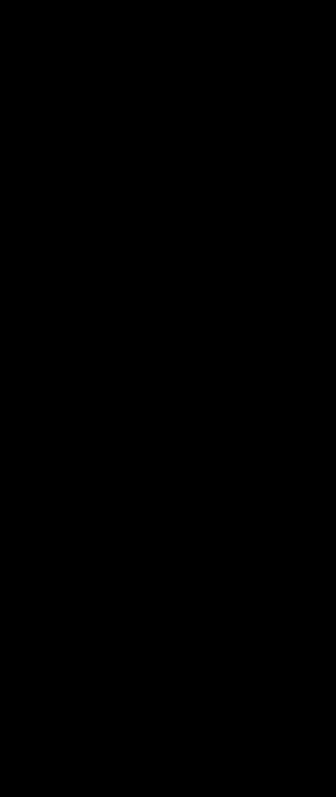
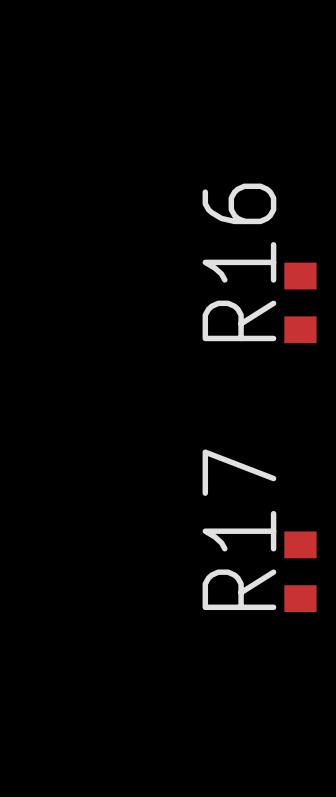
R16: none -> (300, 302)
R17: none -> (300, 571)

